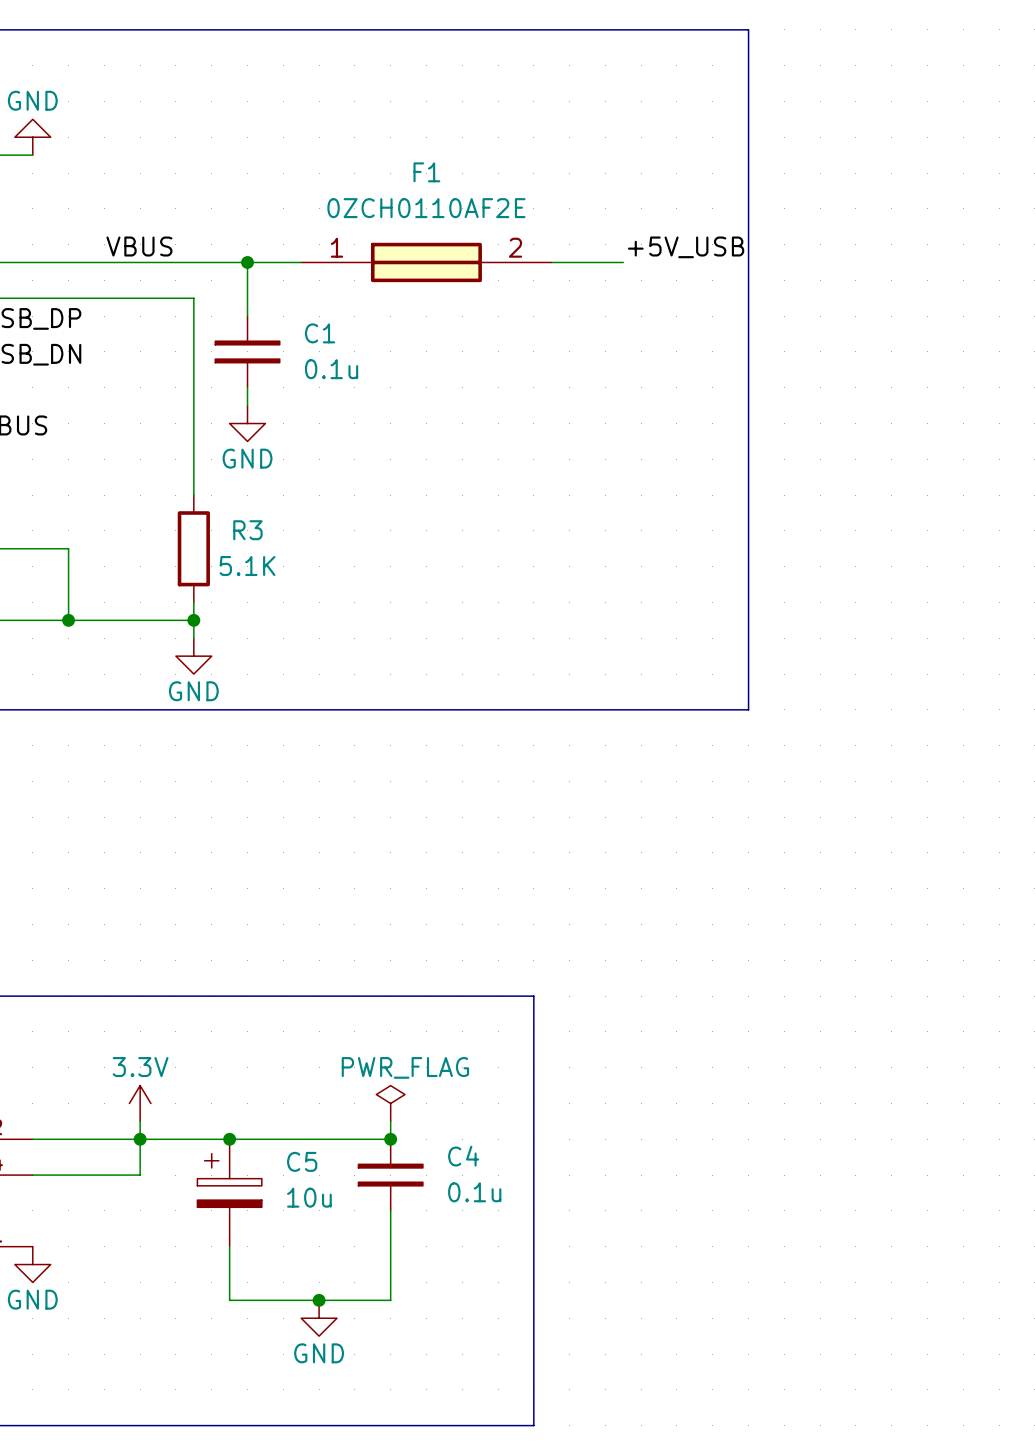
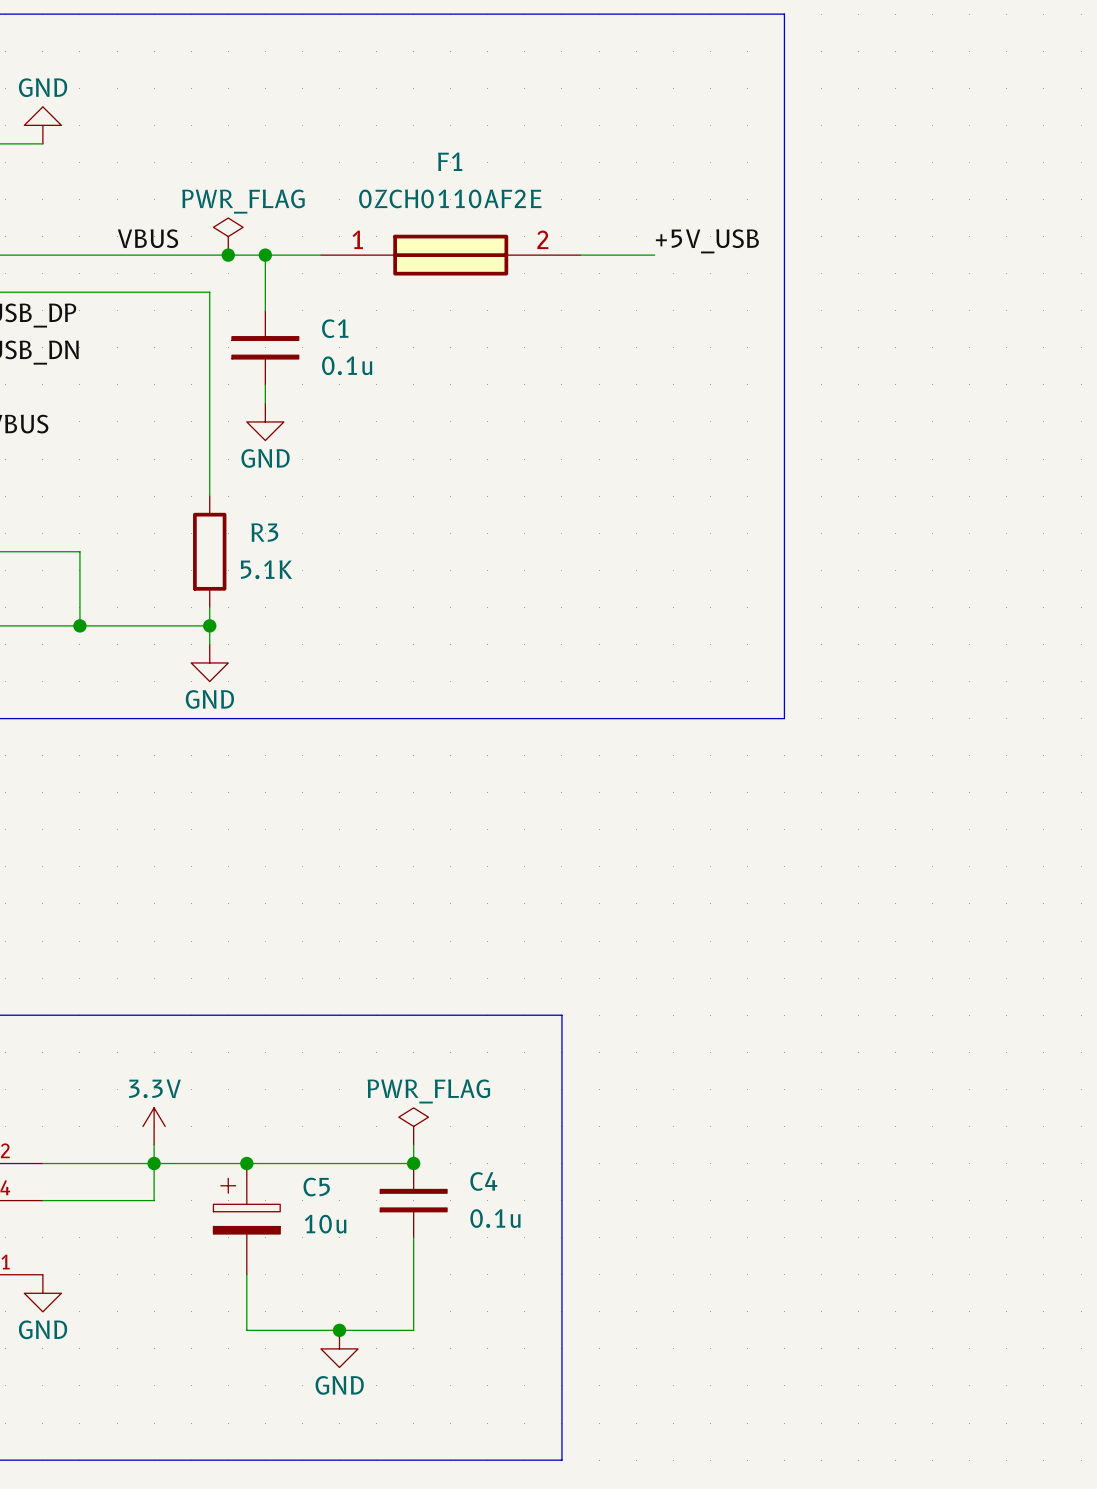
power symbol: none -> PWR_FLAG (228, 236)
junction: none -> (228, 255)

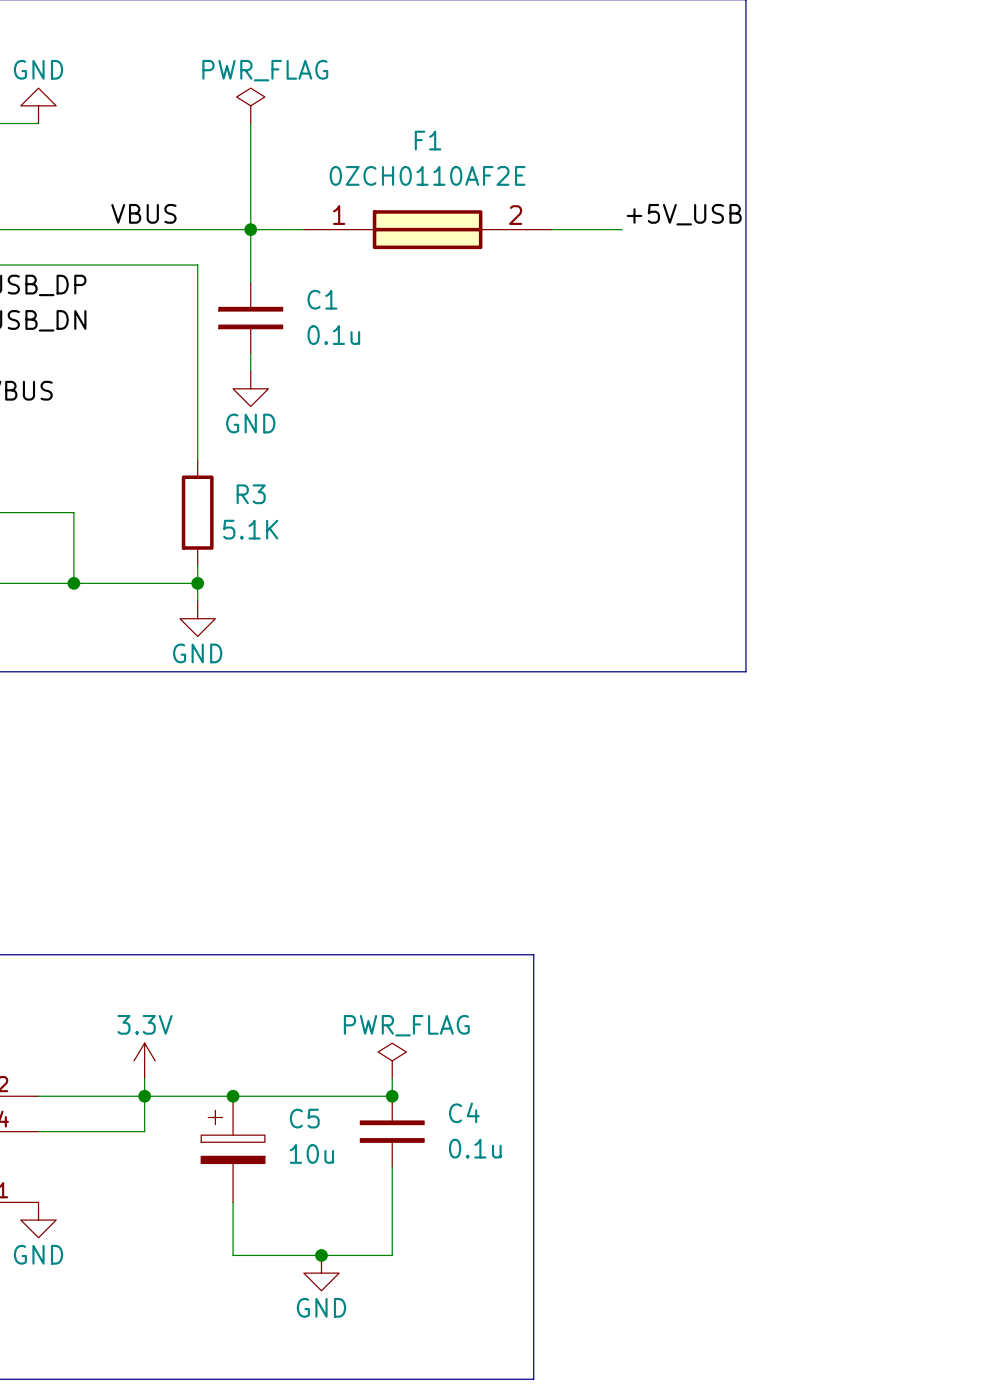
wire: none -> (250, 123) (250, 229)
power symbol position: PWR_FLAG (228, 236) -> PWR_FLAG (250, 105)
junction: (228, 255) -> none

